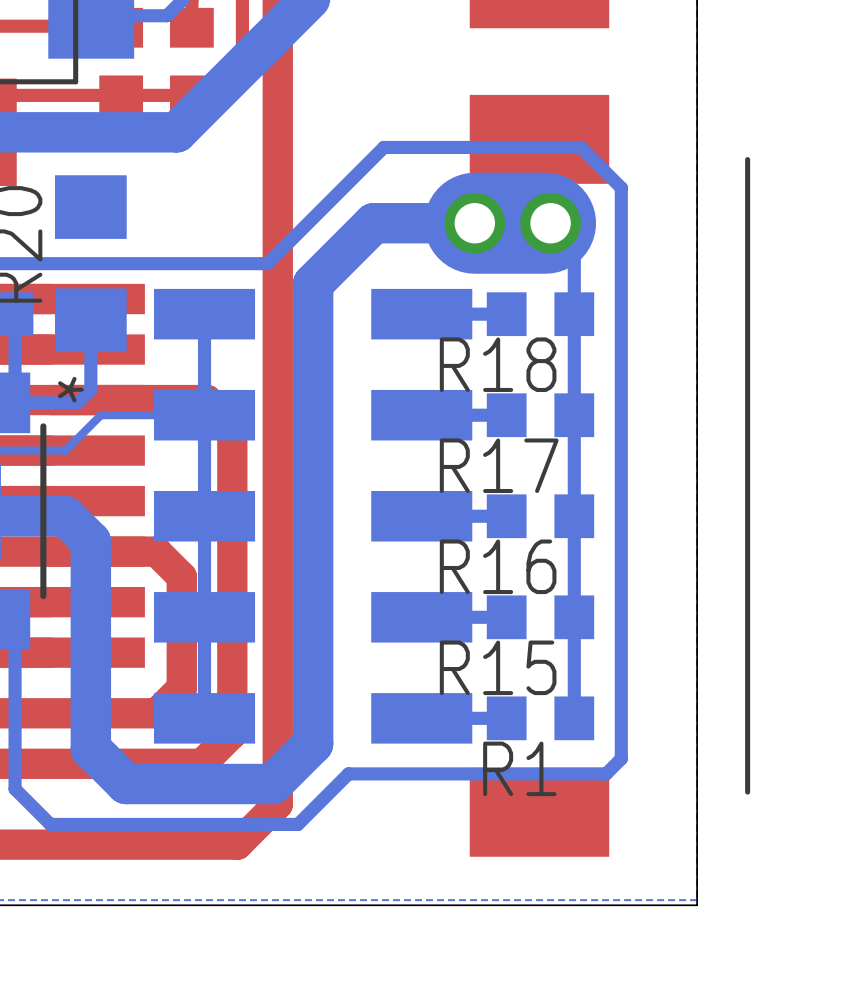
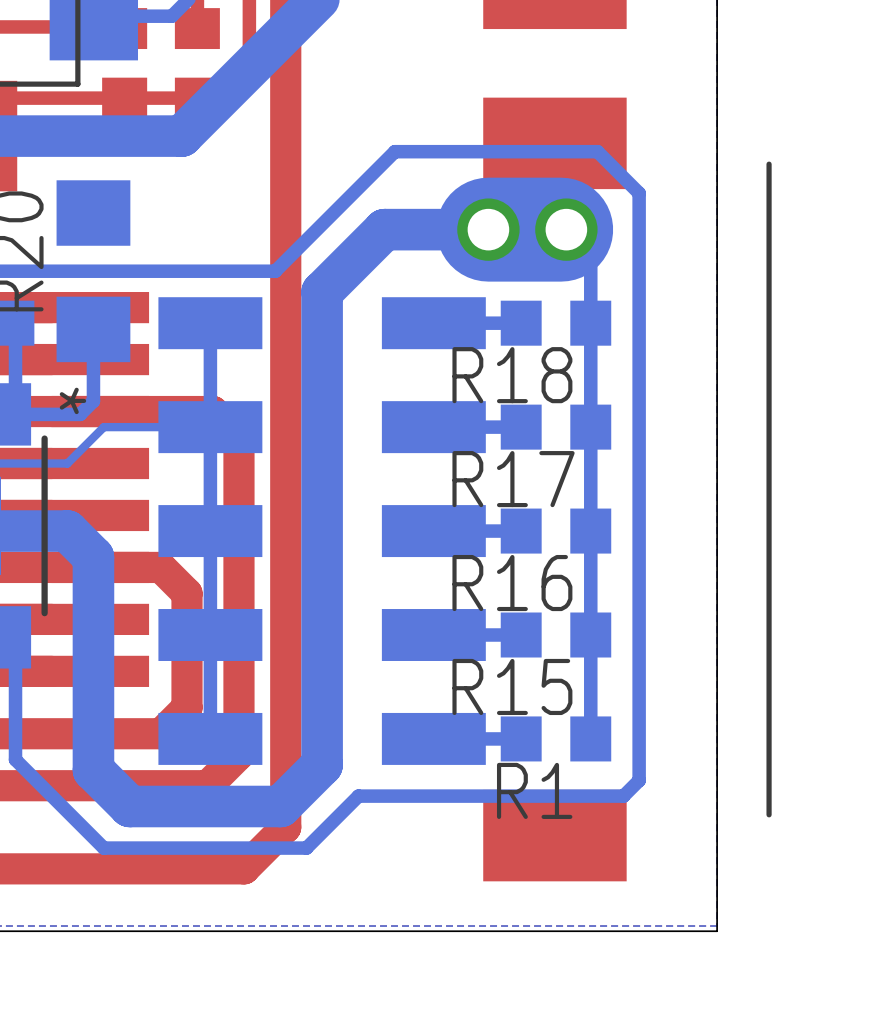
bottom track: (15, 738) (15, 789) (50, 824) (100, 824) -> (15, 759) (103, 848)

